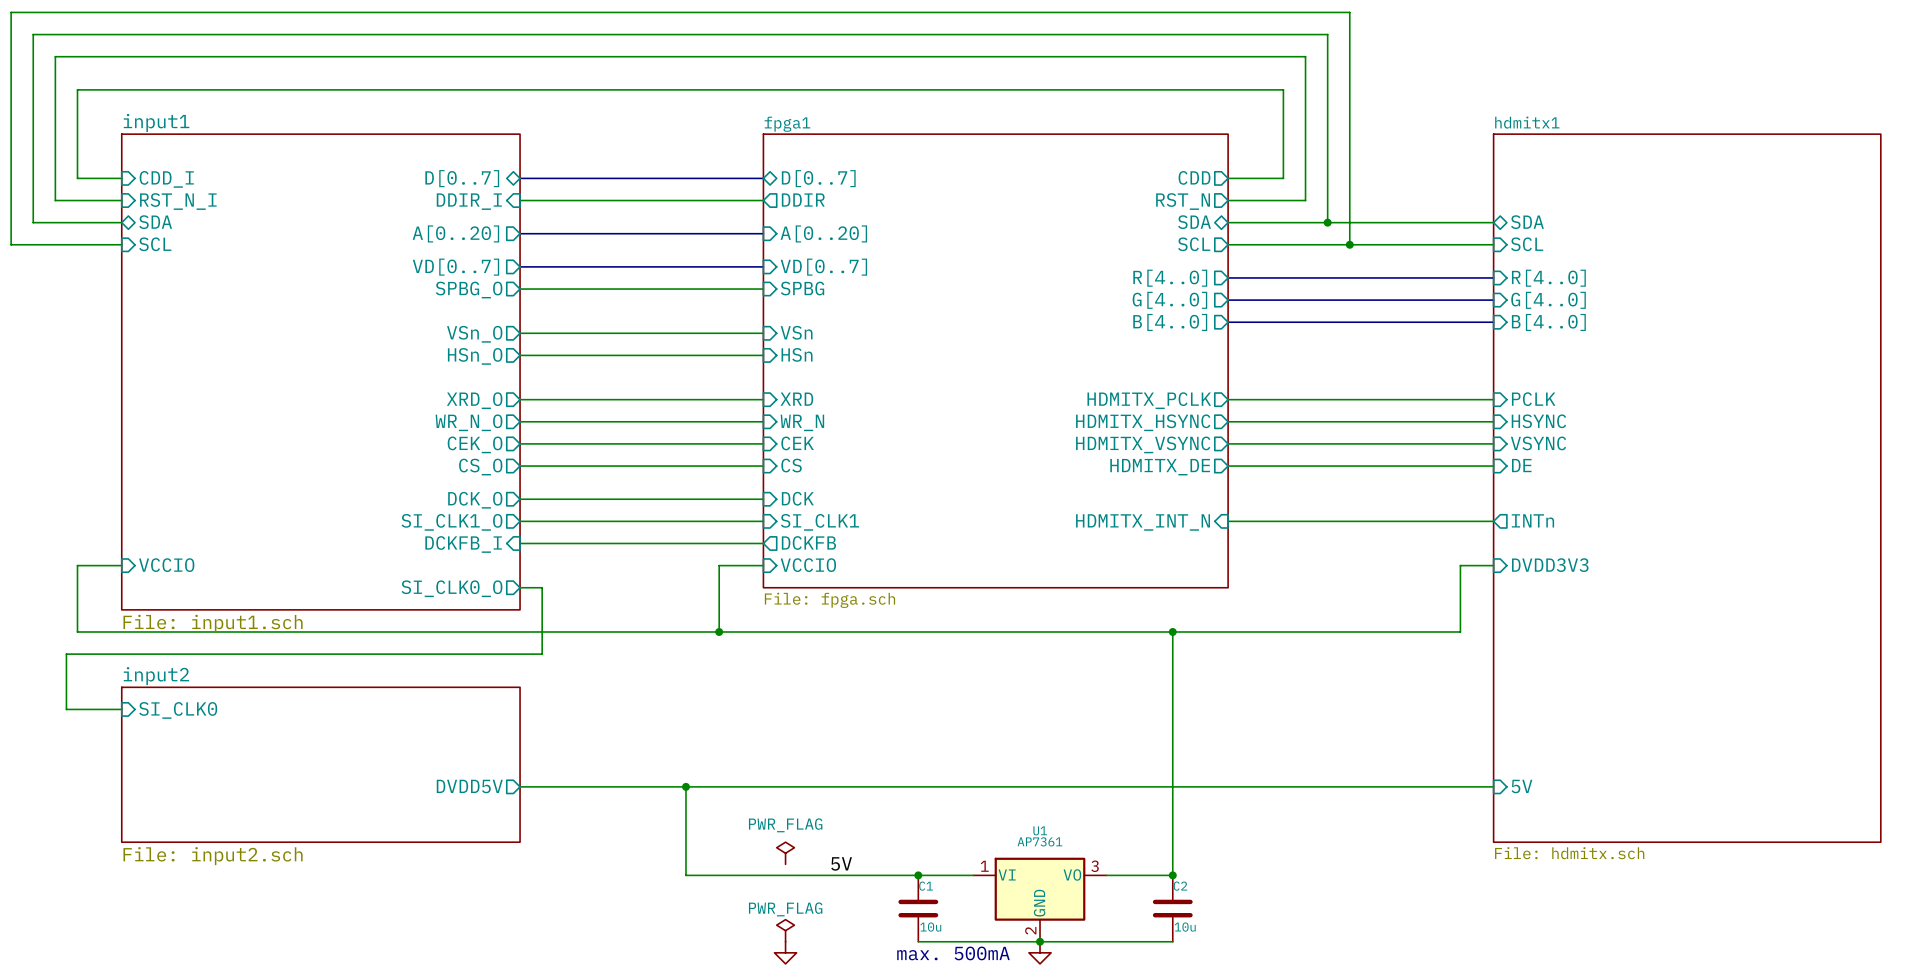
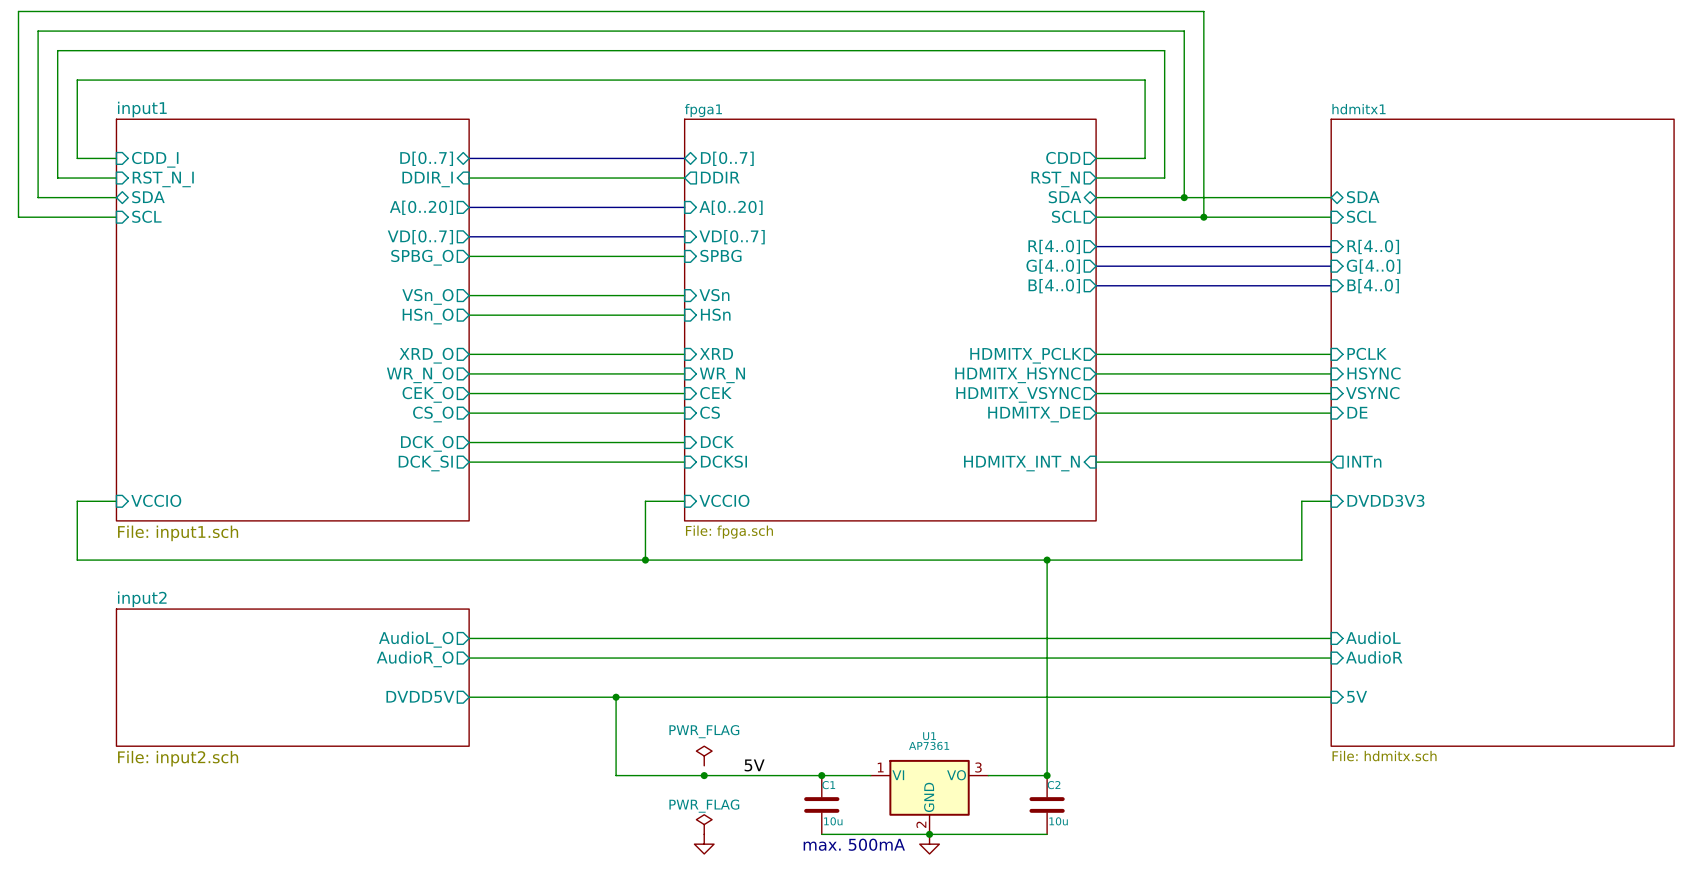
sheet input1 shape: [121, 134, 521, 610] -> [116, 119, 470, 521]
sheet pin: SI_CLK1_O (451, 522) -> DCK_SI (425, 463)
sheet pin: SI_CLK1 (819, 522) -> DCKSI (723, 461)
sheet pin: DCKFB (808, 542) -> none
wire: (520, 543) (763, 543) -> none
sheet pin: DCKFB_I (463, 544) -> none
wire: (520, 587) (542, 587) (542, 654) (66, 654) (66, 709) (121, 709) -> none
sheet pin: SI_CLK0_O (451, 588) -> none
sheet pin: SI_CLK0 (178, 710) -> none
sheet pin: none -> AudioL (1373, 637)
wire: none -> (469, 638) (1331, 638)
sheet pin: none -> AudioL_O (416, 639)
sheet pin: none -> AudioR (1374, 657)
wire: none -> (469, 658) (1331, 658)
sheet pin: none -> AudioR_O (415, 659)
junction: none -> (704, 775)

